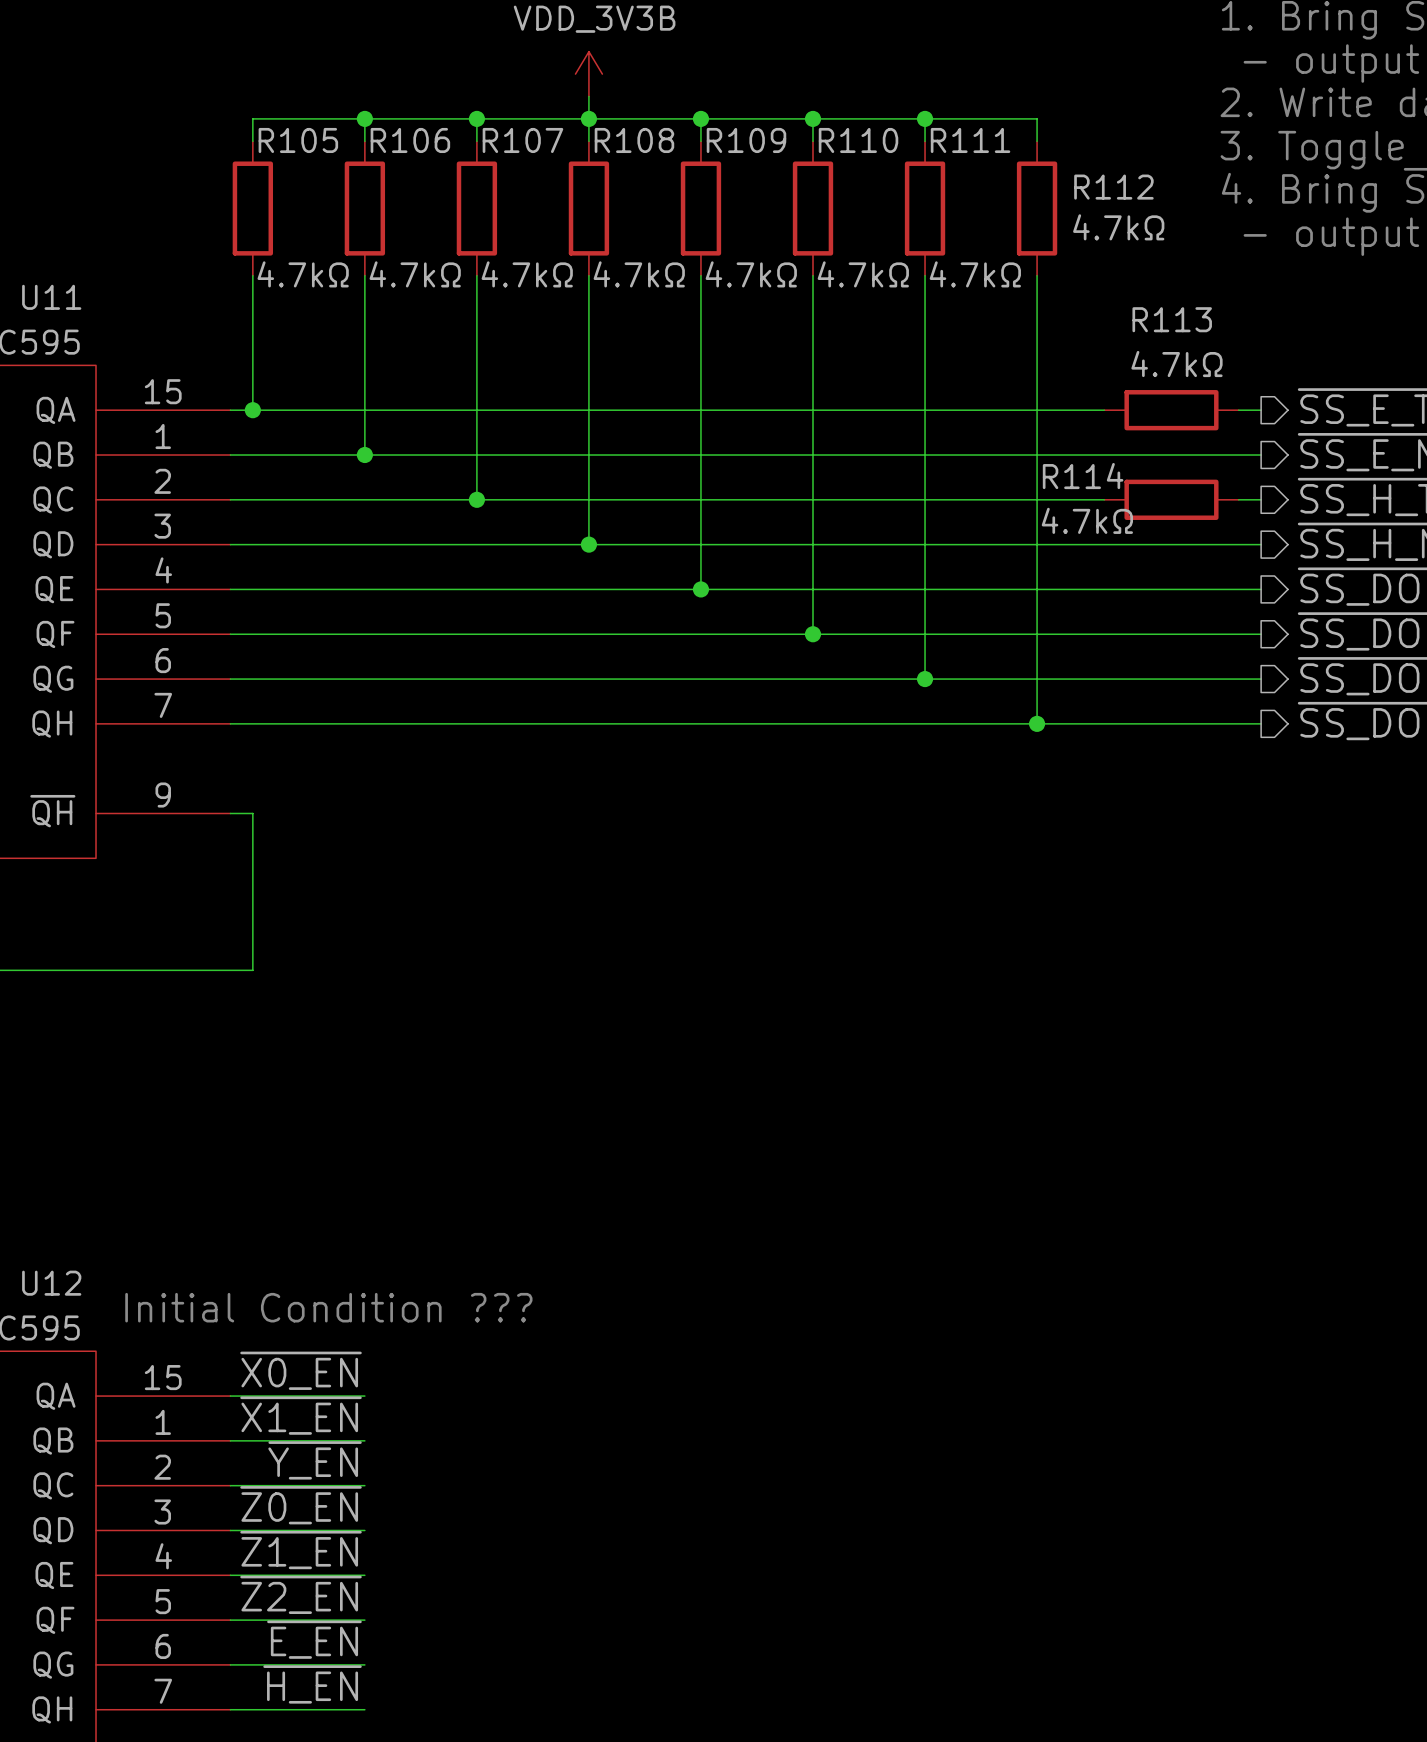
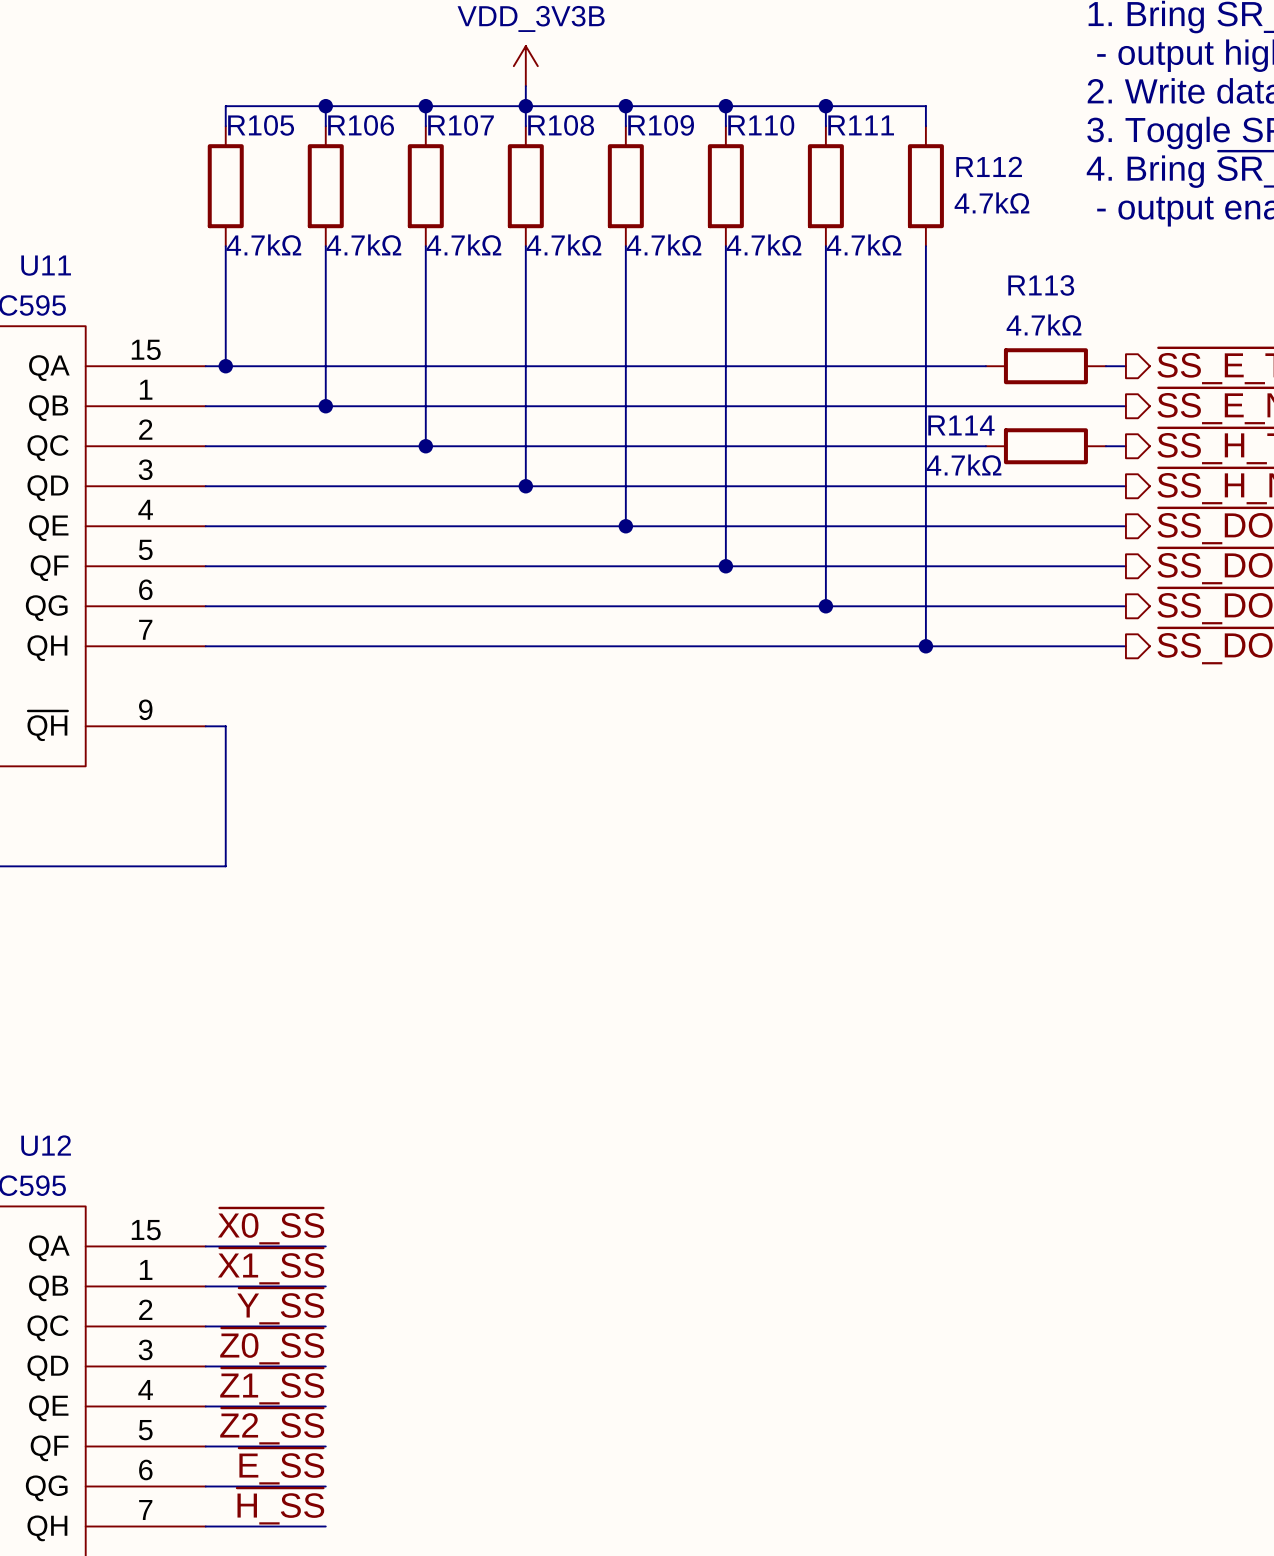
text: Initial Condition ??? (328, 1307) -> none
label: ~{X0_EN} (301, 1370) -> ~{X0_SS} (271, 1226)
label: ~{X1_EN} (301, 1415) -> ~{X1_SS} (271, 1266)
label: ~{Y_EN} (315, 1460) -> ~{Y_SS} (280, 1306)
label: ~{Z0_EN} (301, 1505) -> ~{Z0_SS} (272, 1346)
label: ~{Z1_EN} (301, 1550) -> ~{Z1_SS} (272, 1386)
label: ~{Z2_EN} (301, 1594) -> ~{Z2_SS} (272, 1426)
label: ~{E_EN} (314, 1639) -> ~{E_SS} (281, 1466)
label: ~{H_EN} (312, 1684) -> ~{H_SS} (280, 1506)

